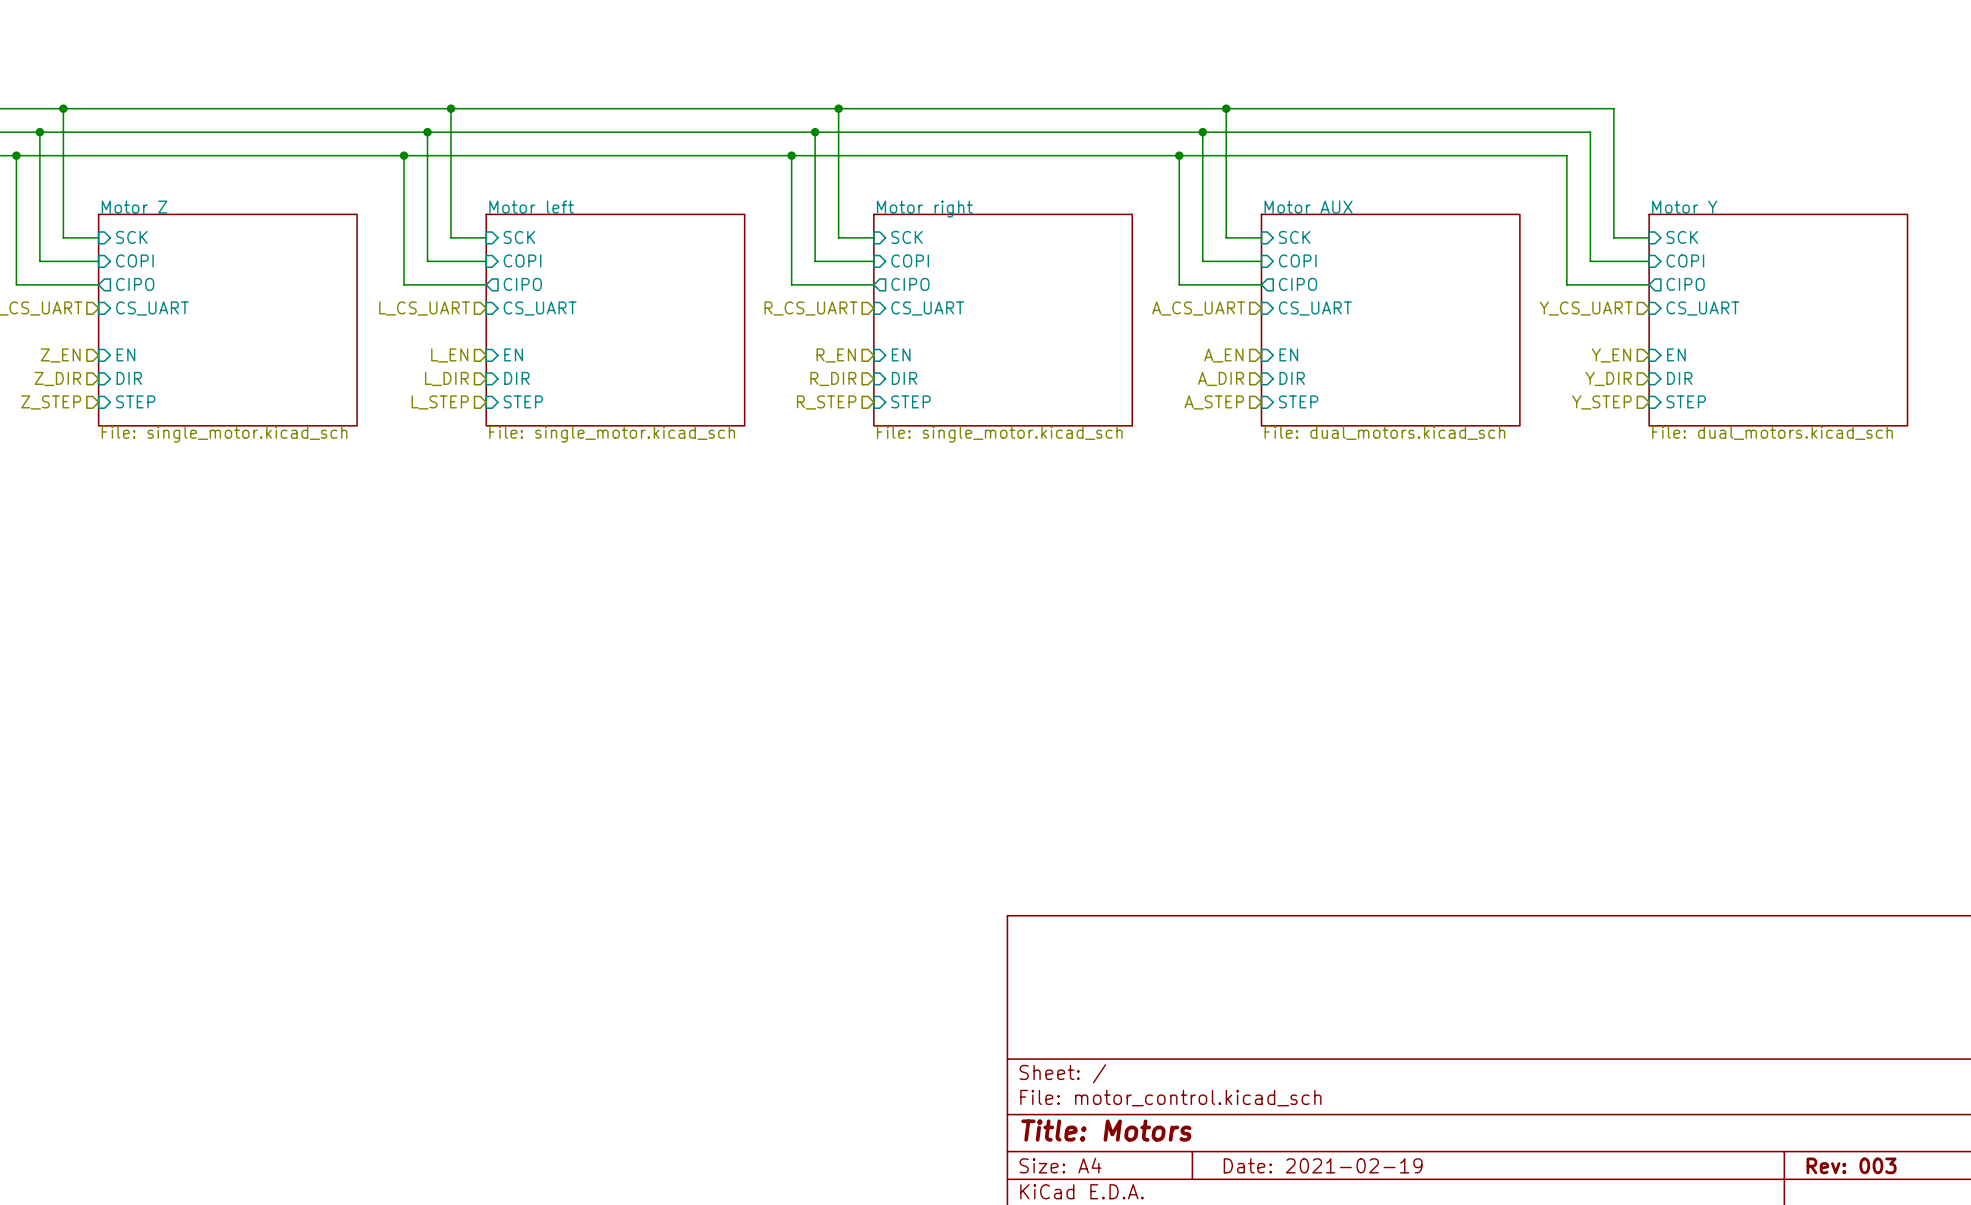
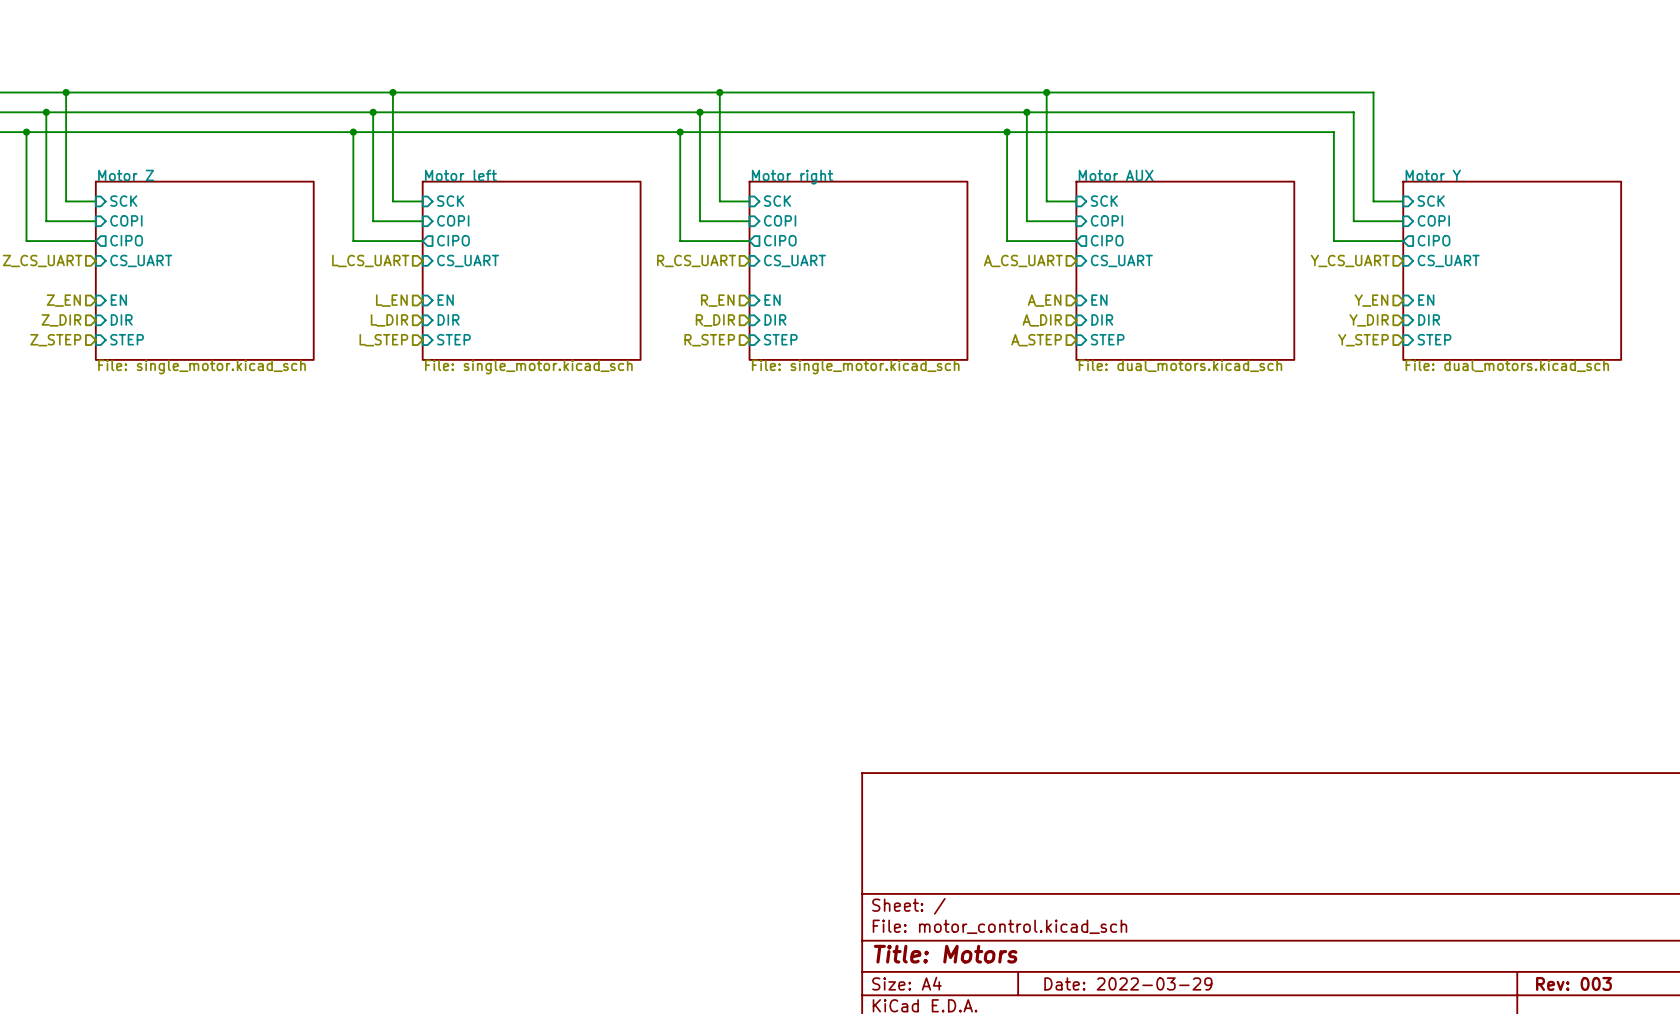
title block: Date: 2021-02-19 (1323, 1165) -> Date: 2022-03-29 (1128, 983)

